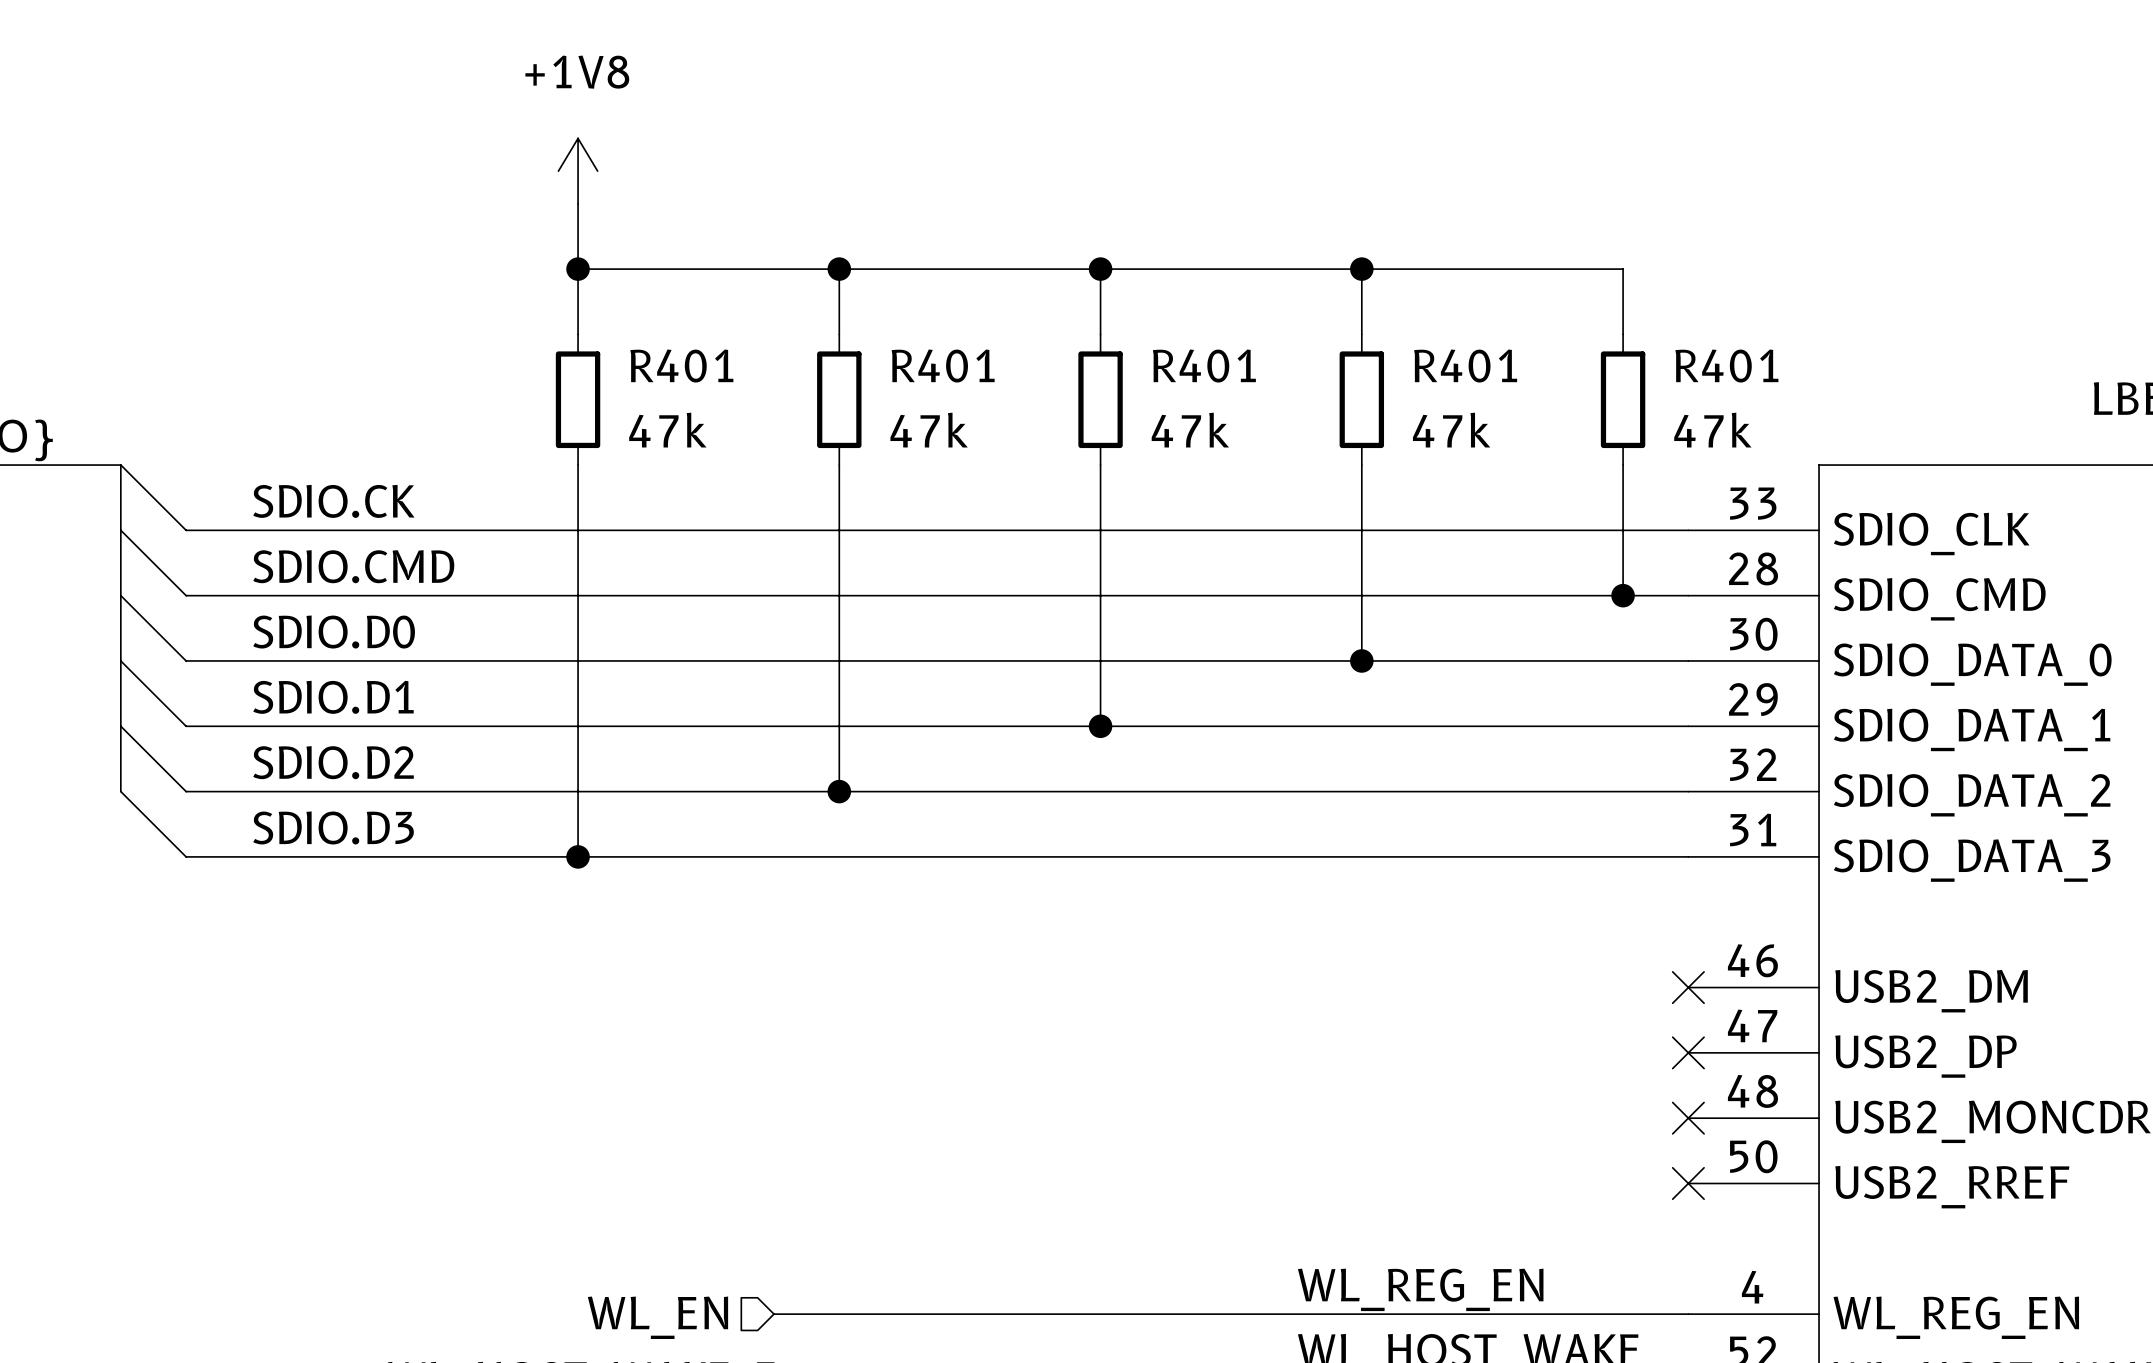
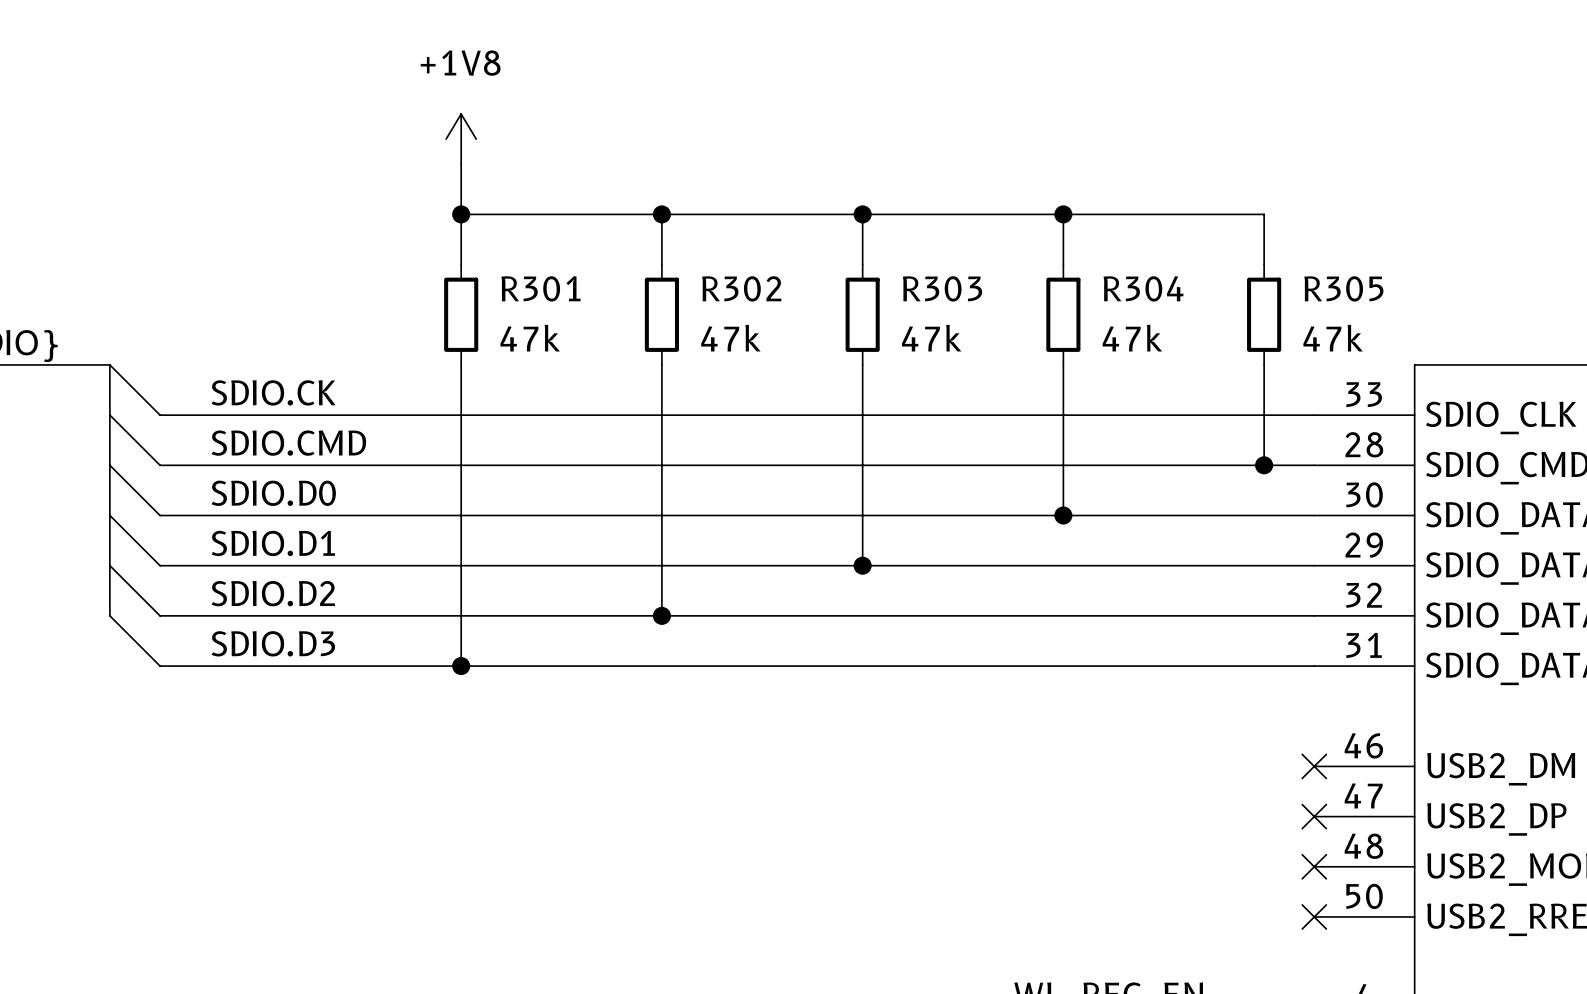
R401 name: R401 (681, 366) -> R301 (540, 288)
R401 name: R401 (943, 366) -> R302 (741, 288)
R401 name: R401 (1204, 366) -> R303 (942, 288)
R401 name: R401 (1465, 366) -> R304 (1143, 288)
R401 name: R401 (1726, 366) -> R305 (1343, 288)

